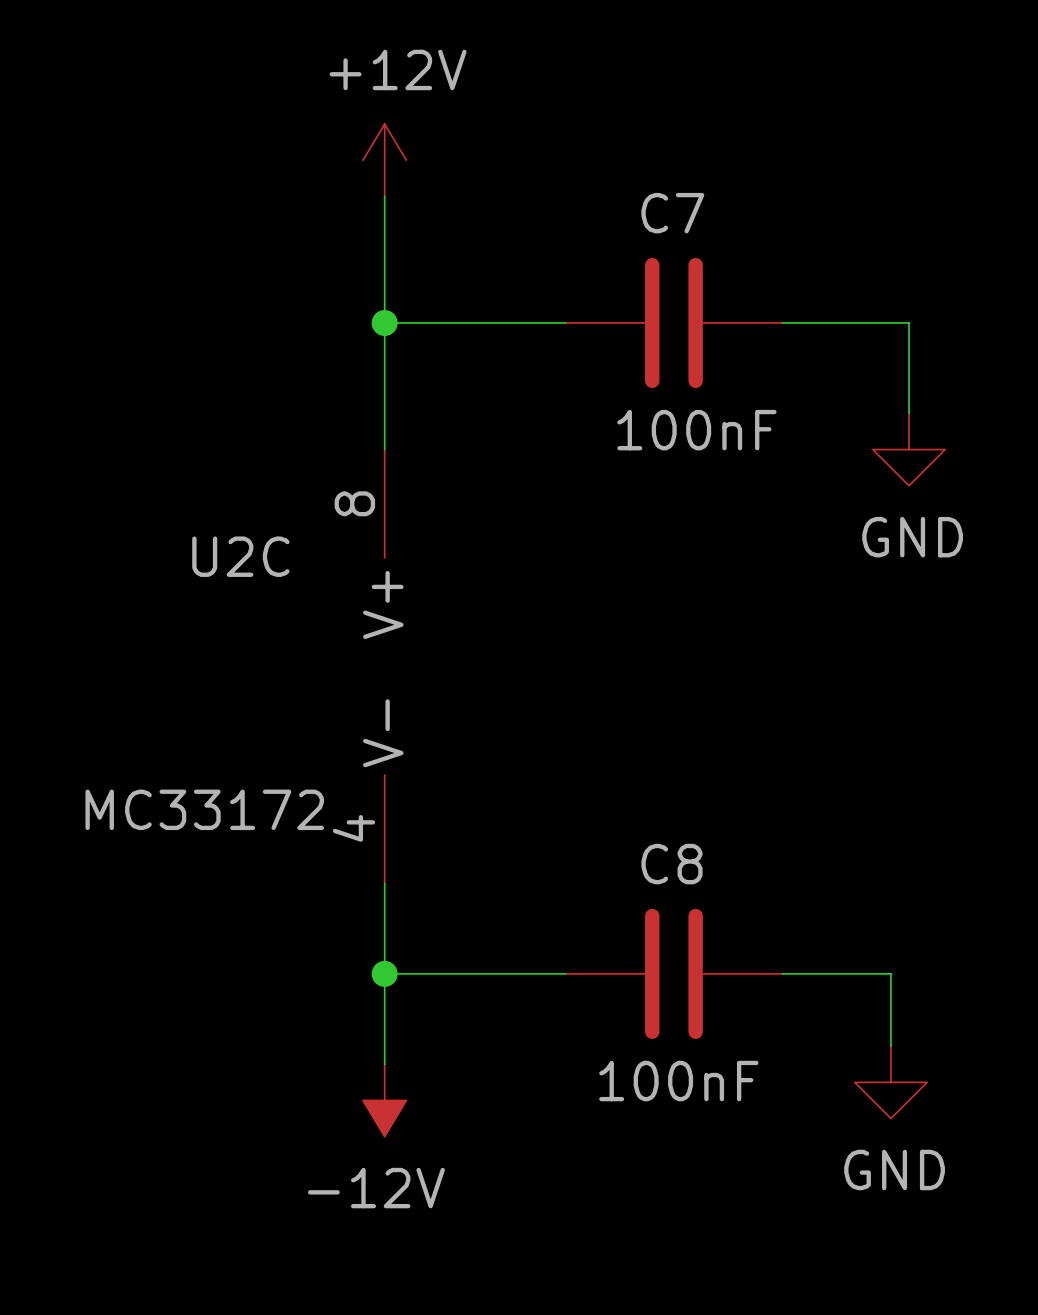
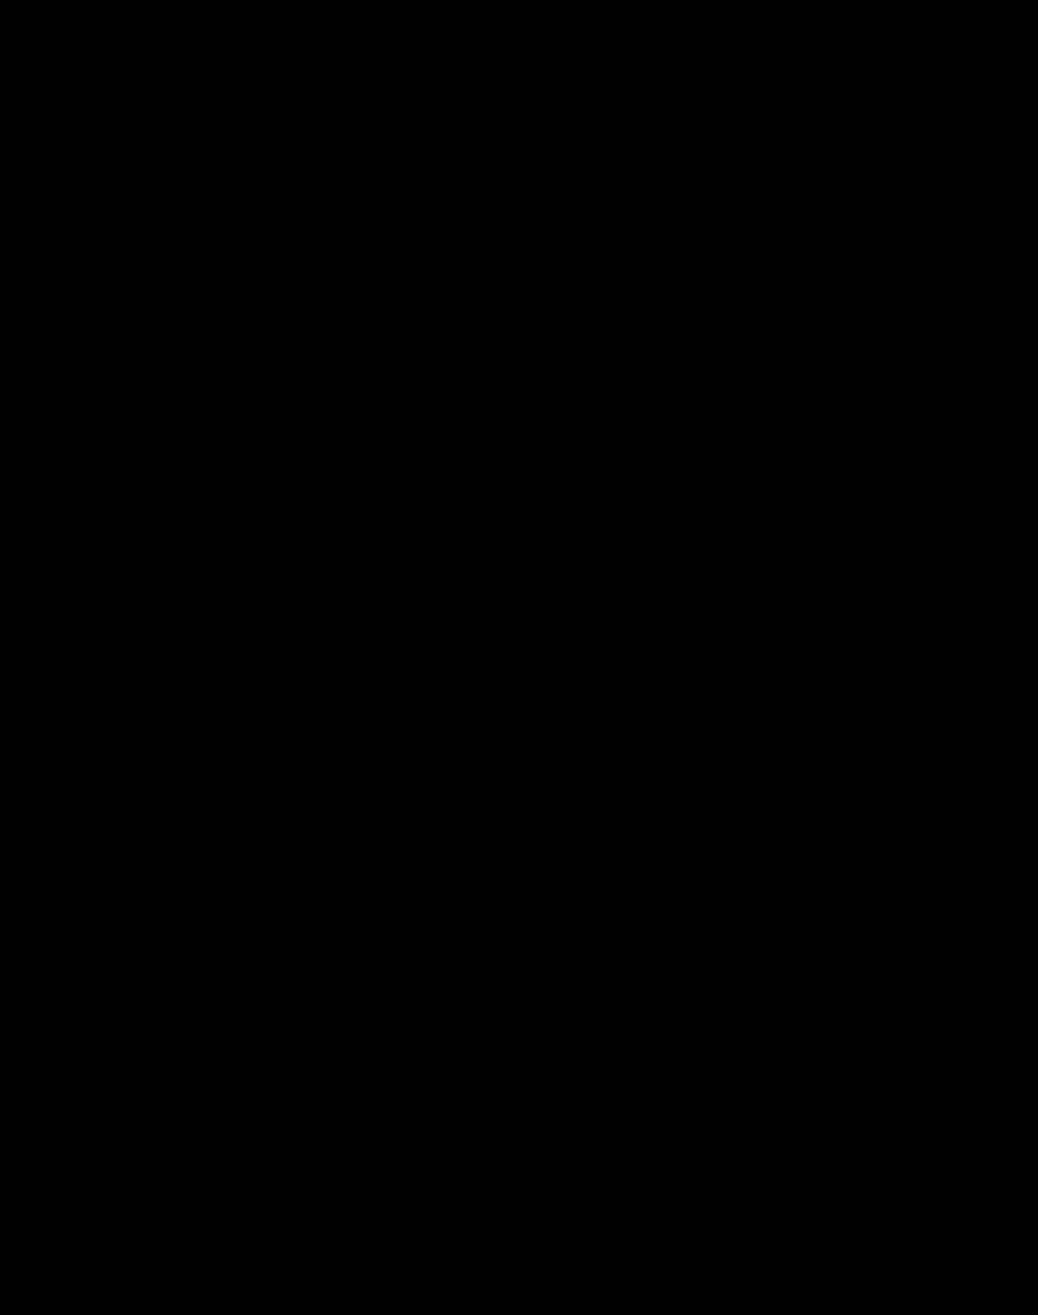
power symbol: +12V (384, 160) -> none
wire: (384, 196) (384, 449) -> none
wire: (384, 323) (565, 323) -> none
junction: (384, 323) -> none
C7: 100nF (673, 323) -> none
wire: (782, 323) (909, 323) (909, 413) -> none
power symbol: GND (909, 449) -> none
U2C: MC33172 (384, 666) -> none
wire: (384, 883) (384, 1064) -> none
wire: (384, 973) (565, 973) -> none
junction: (384, 973) -> none
C8: 100nF (673, 973) -> none
wire: (782, 973) (890, 973) (890, 1046) -> none
power symbol: GND (890, 1082) -> none
power symbol: -12V (384, 1100) -> none

